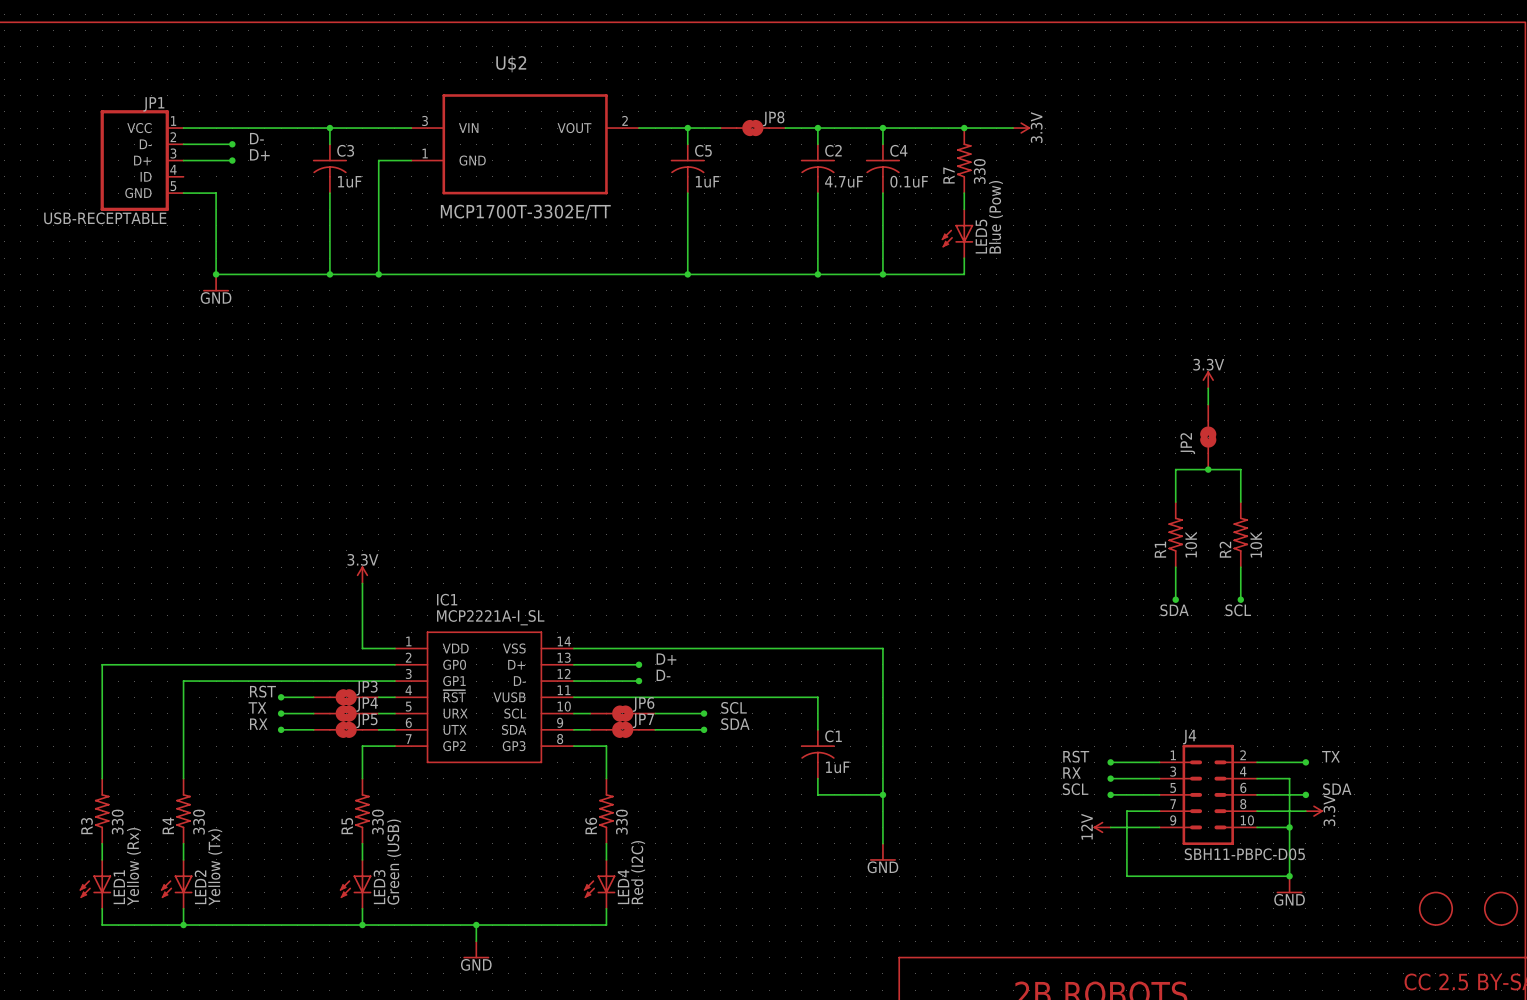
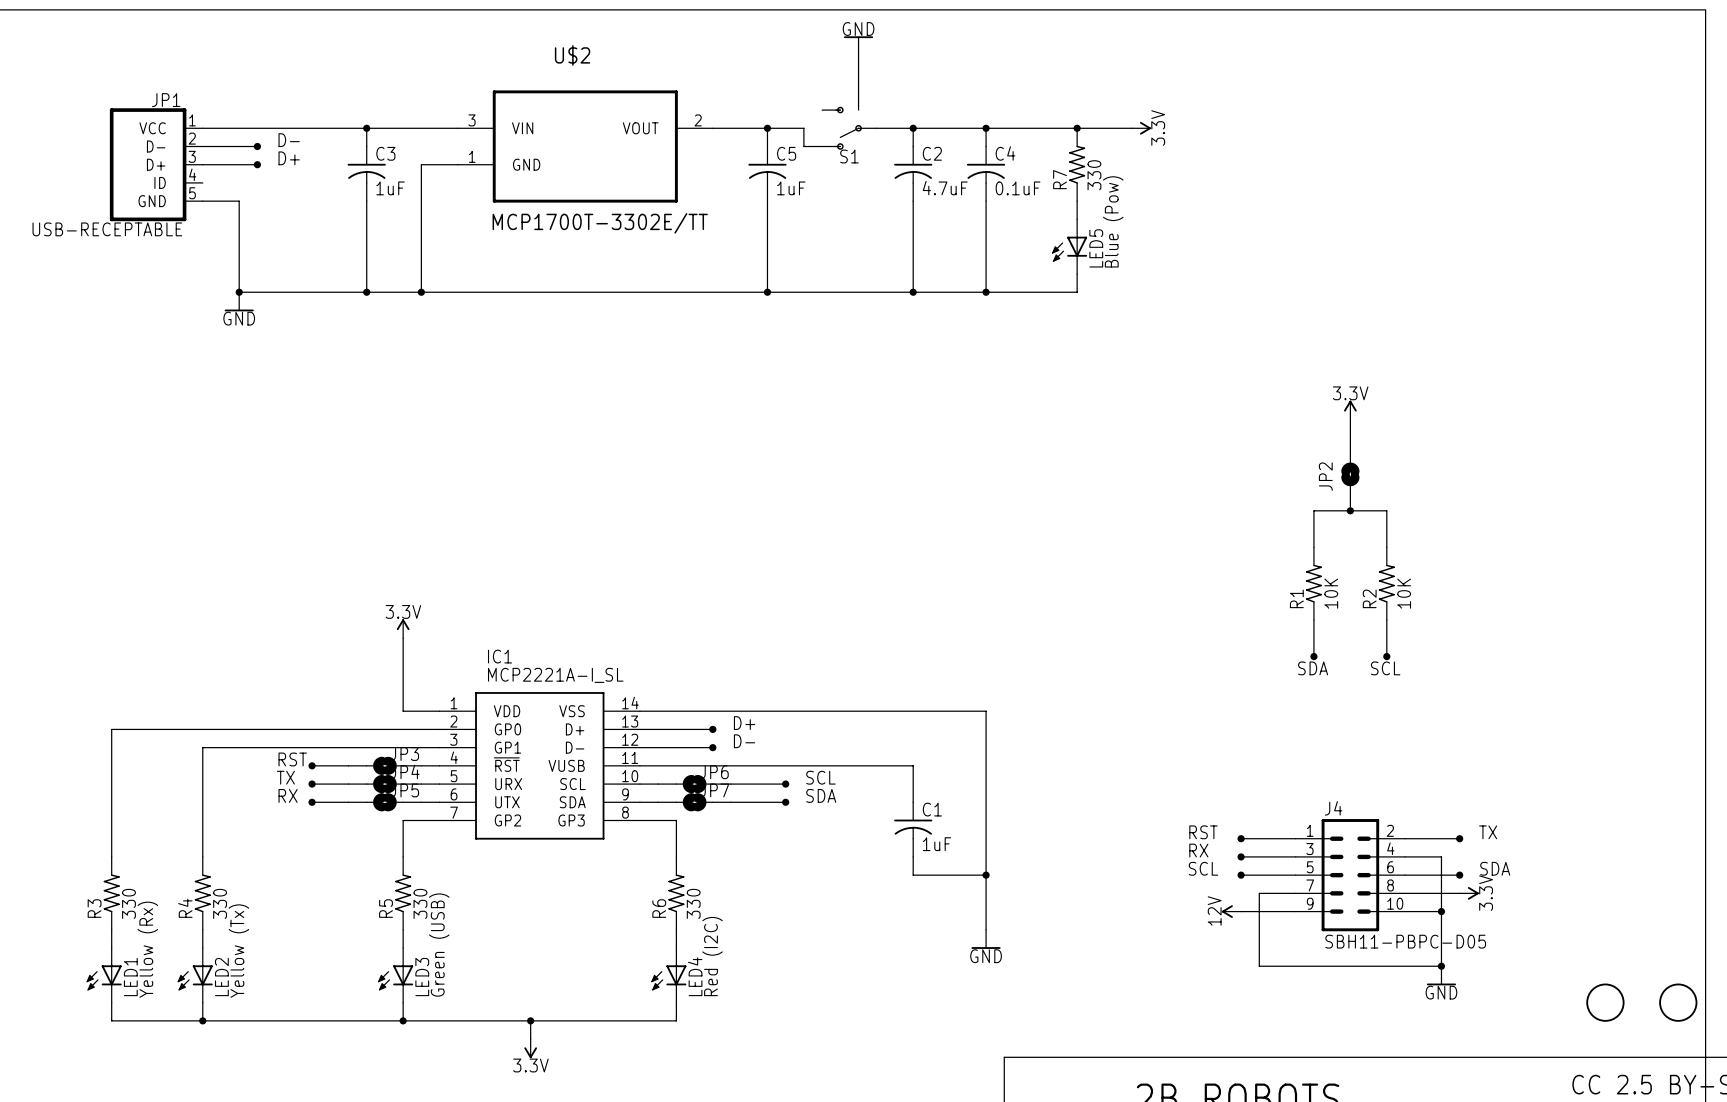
power symbol: none -> GND (858, 45)
wire: none -> (858, 55) (858, 73)
S1: none -> (849, 111)
wire: none -> (803, 128) (803, 146) (822, 146)
JP8: (752, 128) -> none
power symbol: GND (476, 949) -> 3.3V (530, 1048)

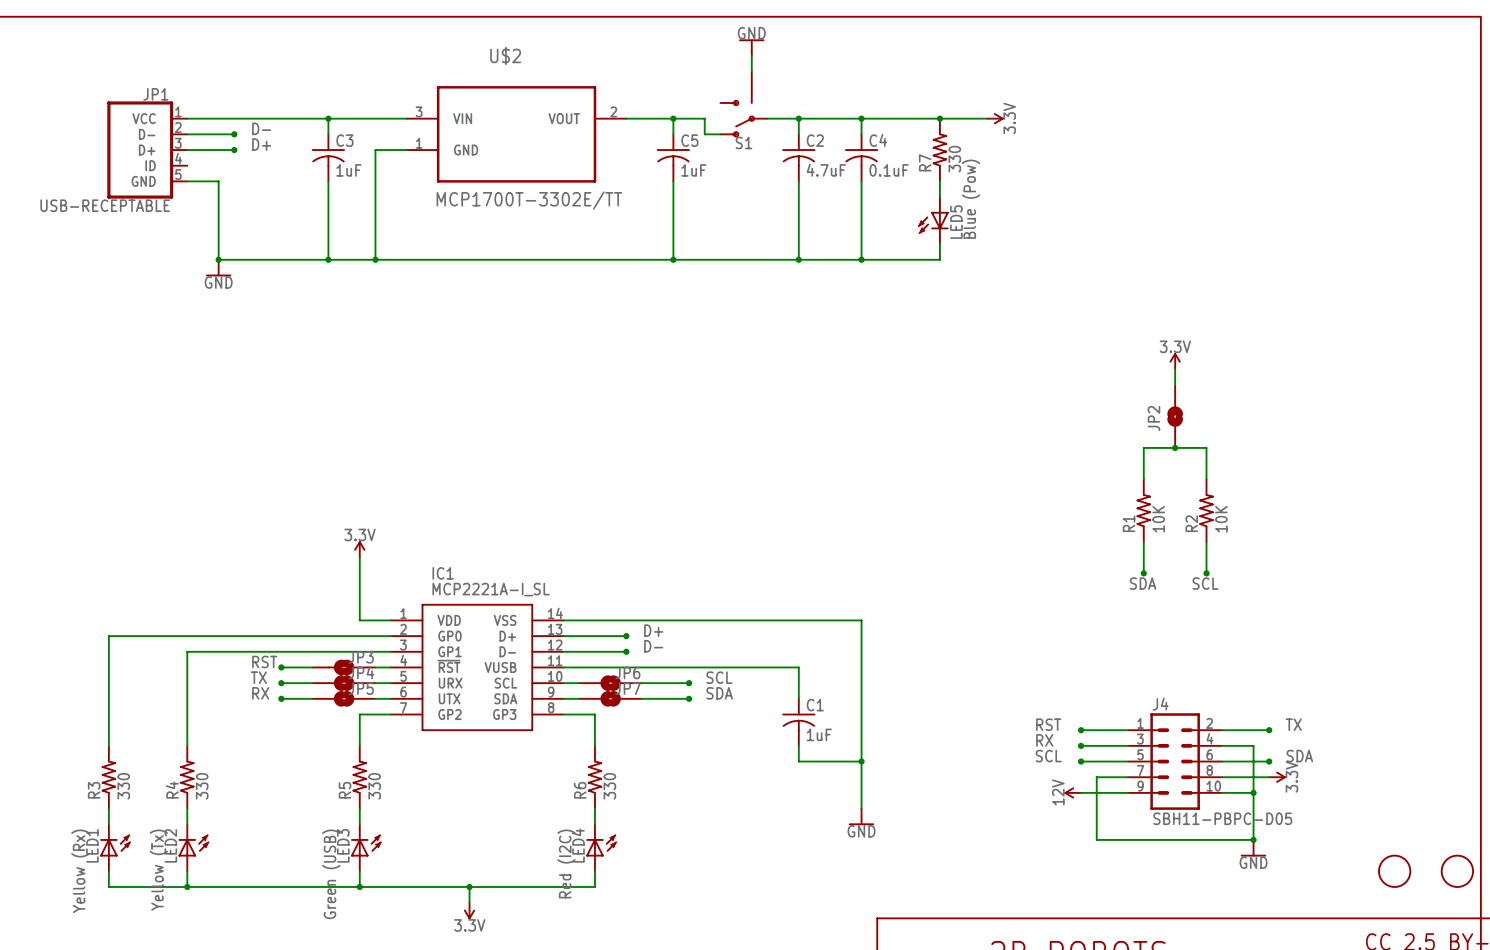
LED1 rotation: 0° (104, 977) -> 180° (115, 845)
LED2 rotation: 0° (195, 977) -> 180° (193, 845)
LED3 rotation: 0° (395, 977) -> 180° (366, 845)
LED4 rotation: 0° (668, 977) -> 180° (601, 845)

